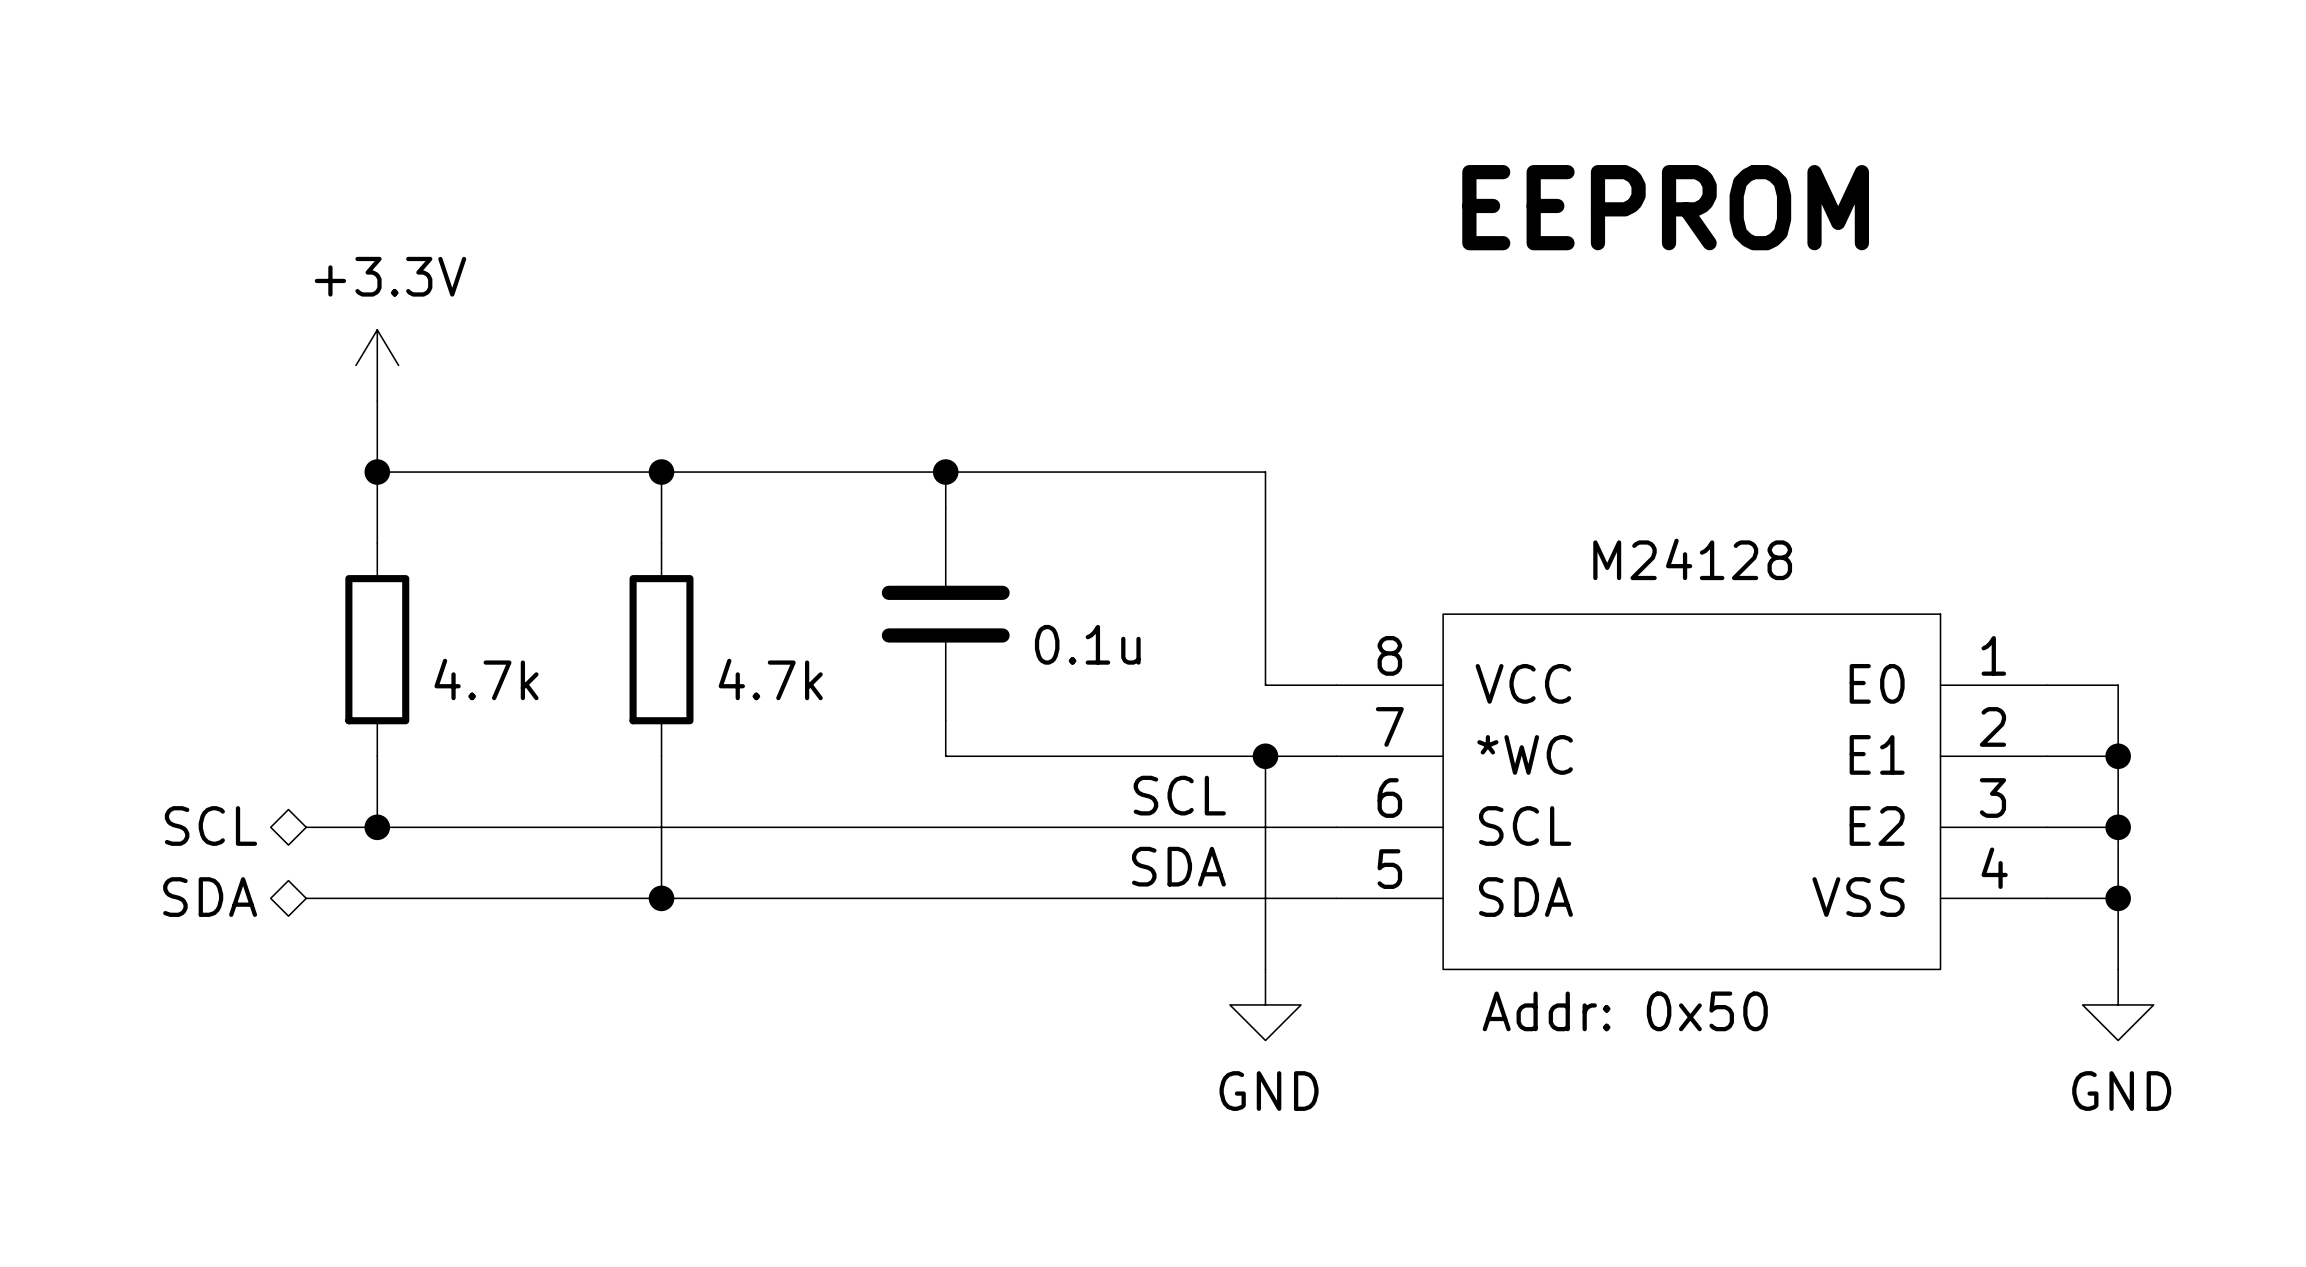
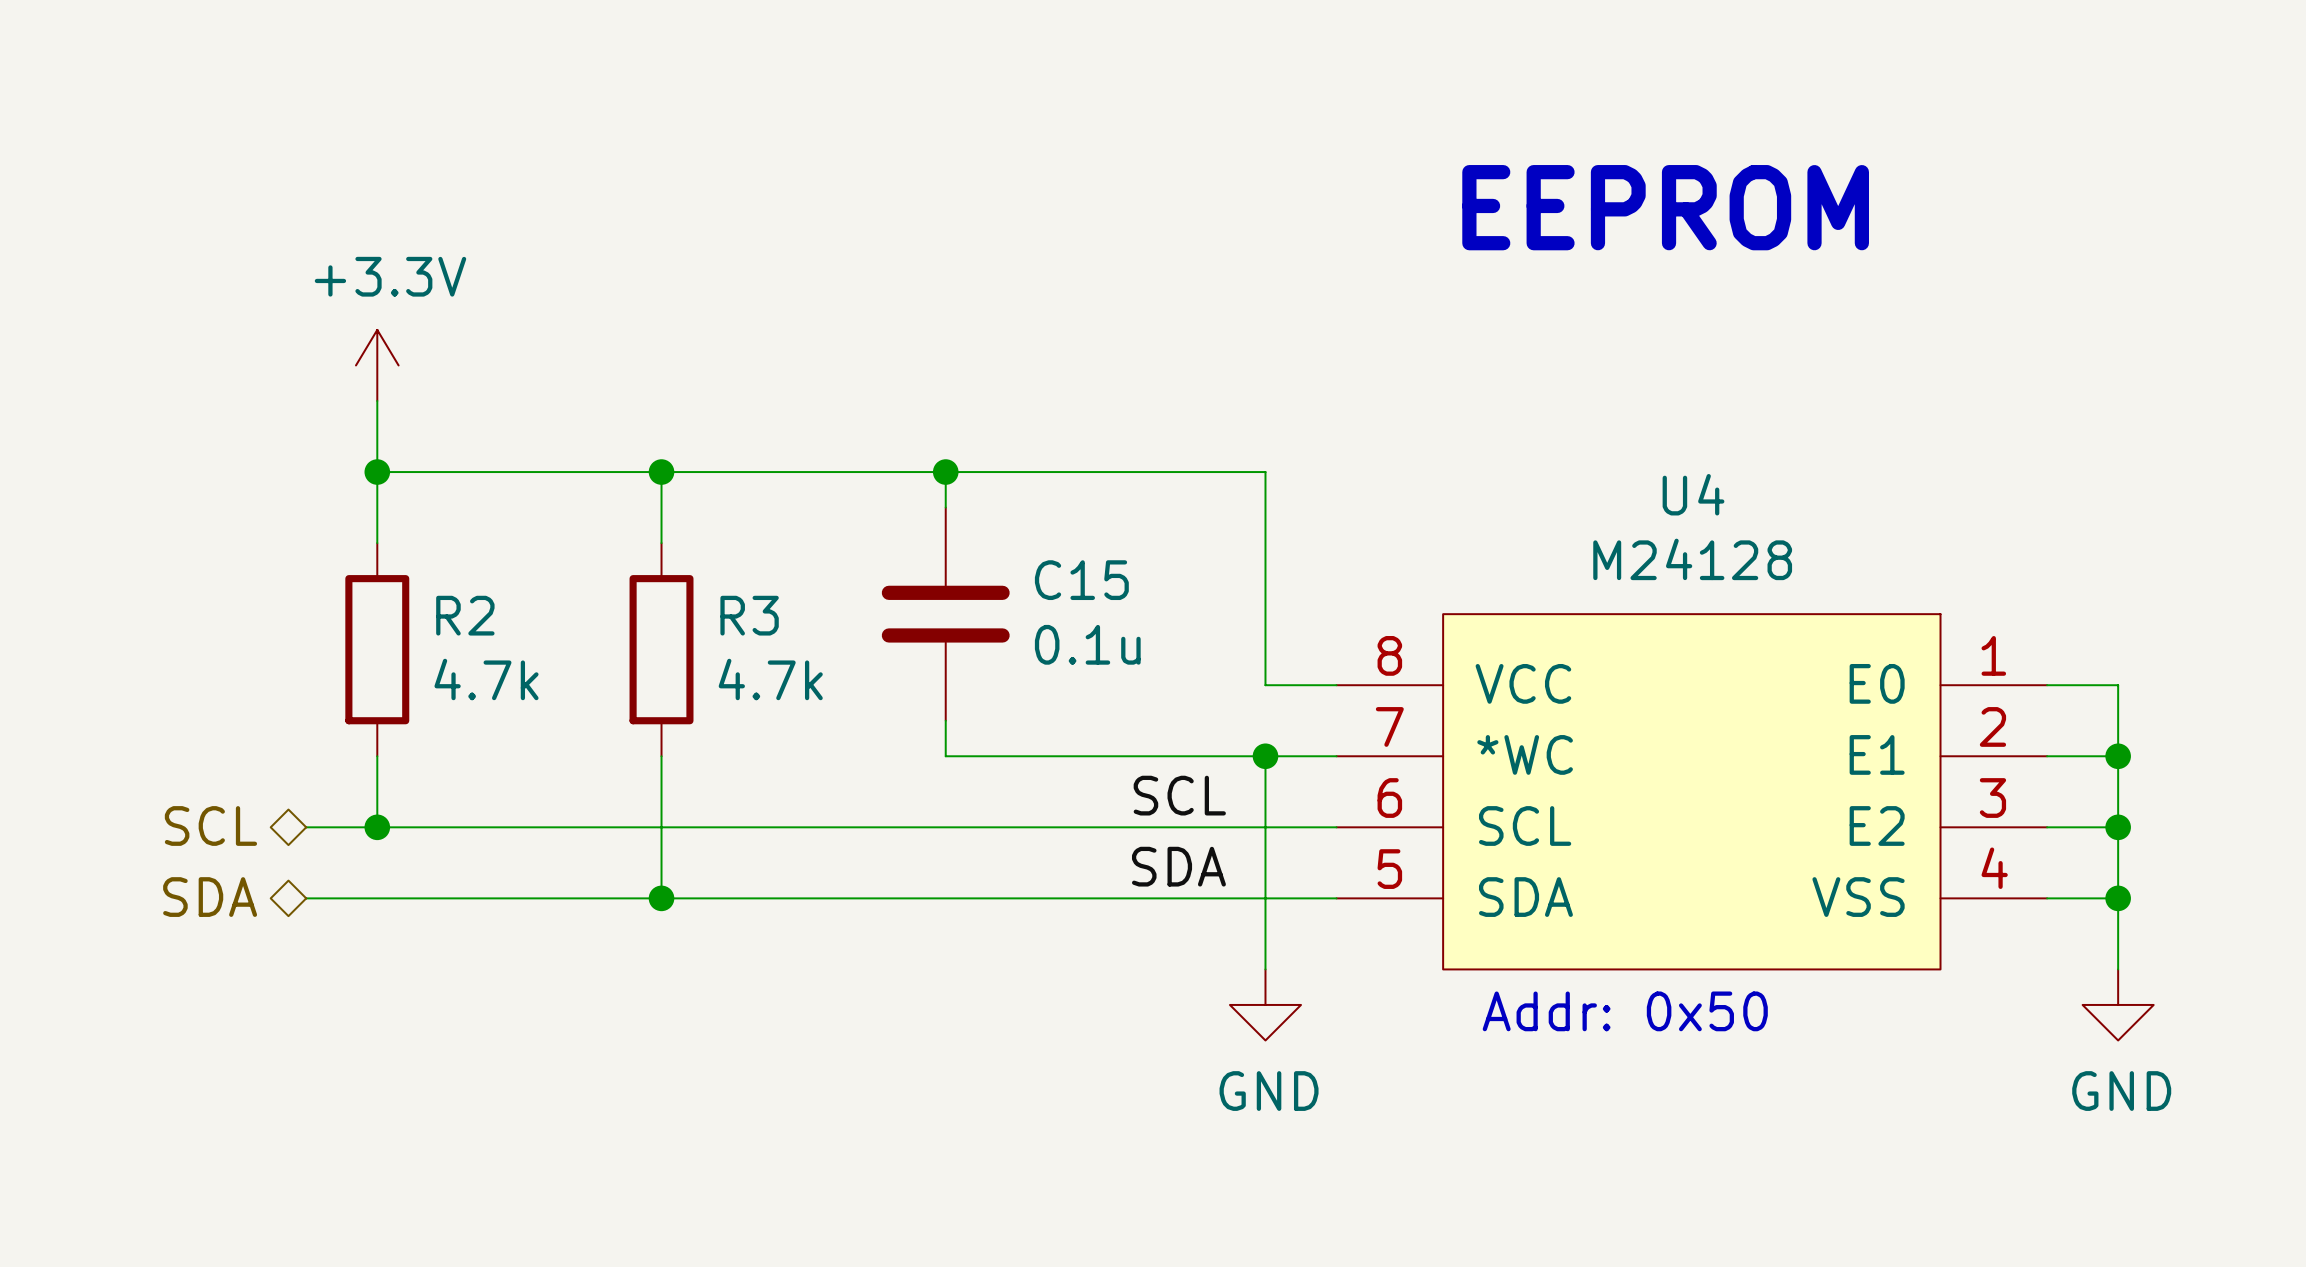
U4 name: none -> U4 (1693, 494)
C15 name: none -> C15 (1081, 580)
R2 name: none -> R2 (465, 615)
R3 name: none -> R3 (749, 615)

